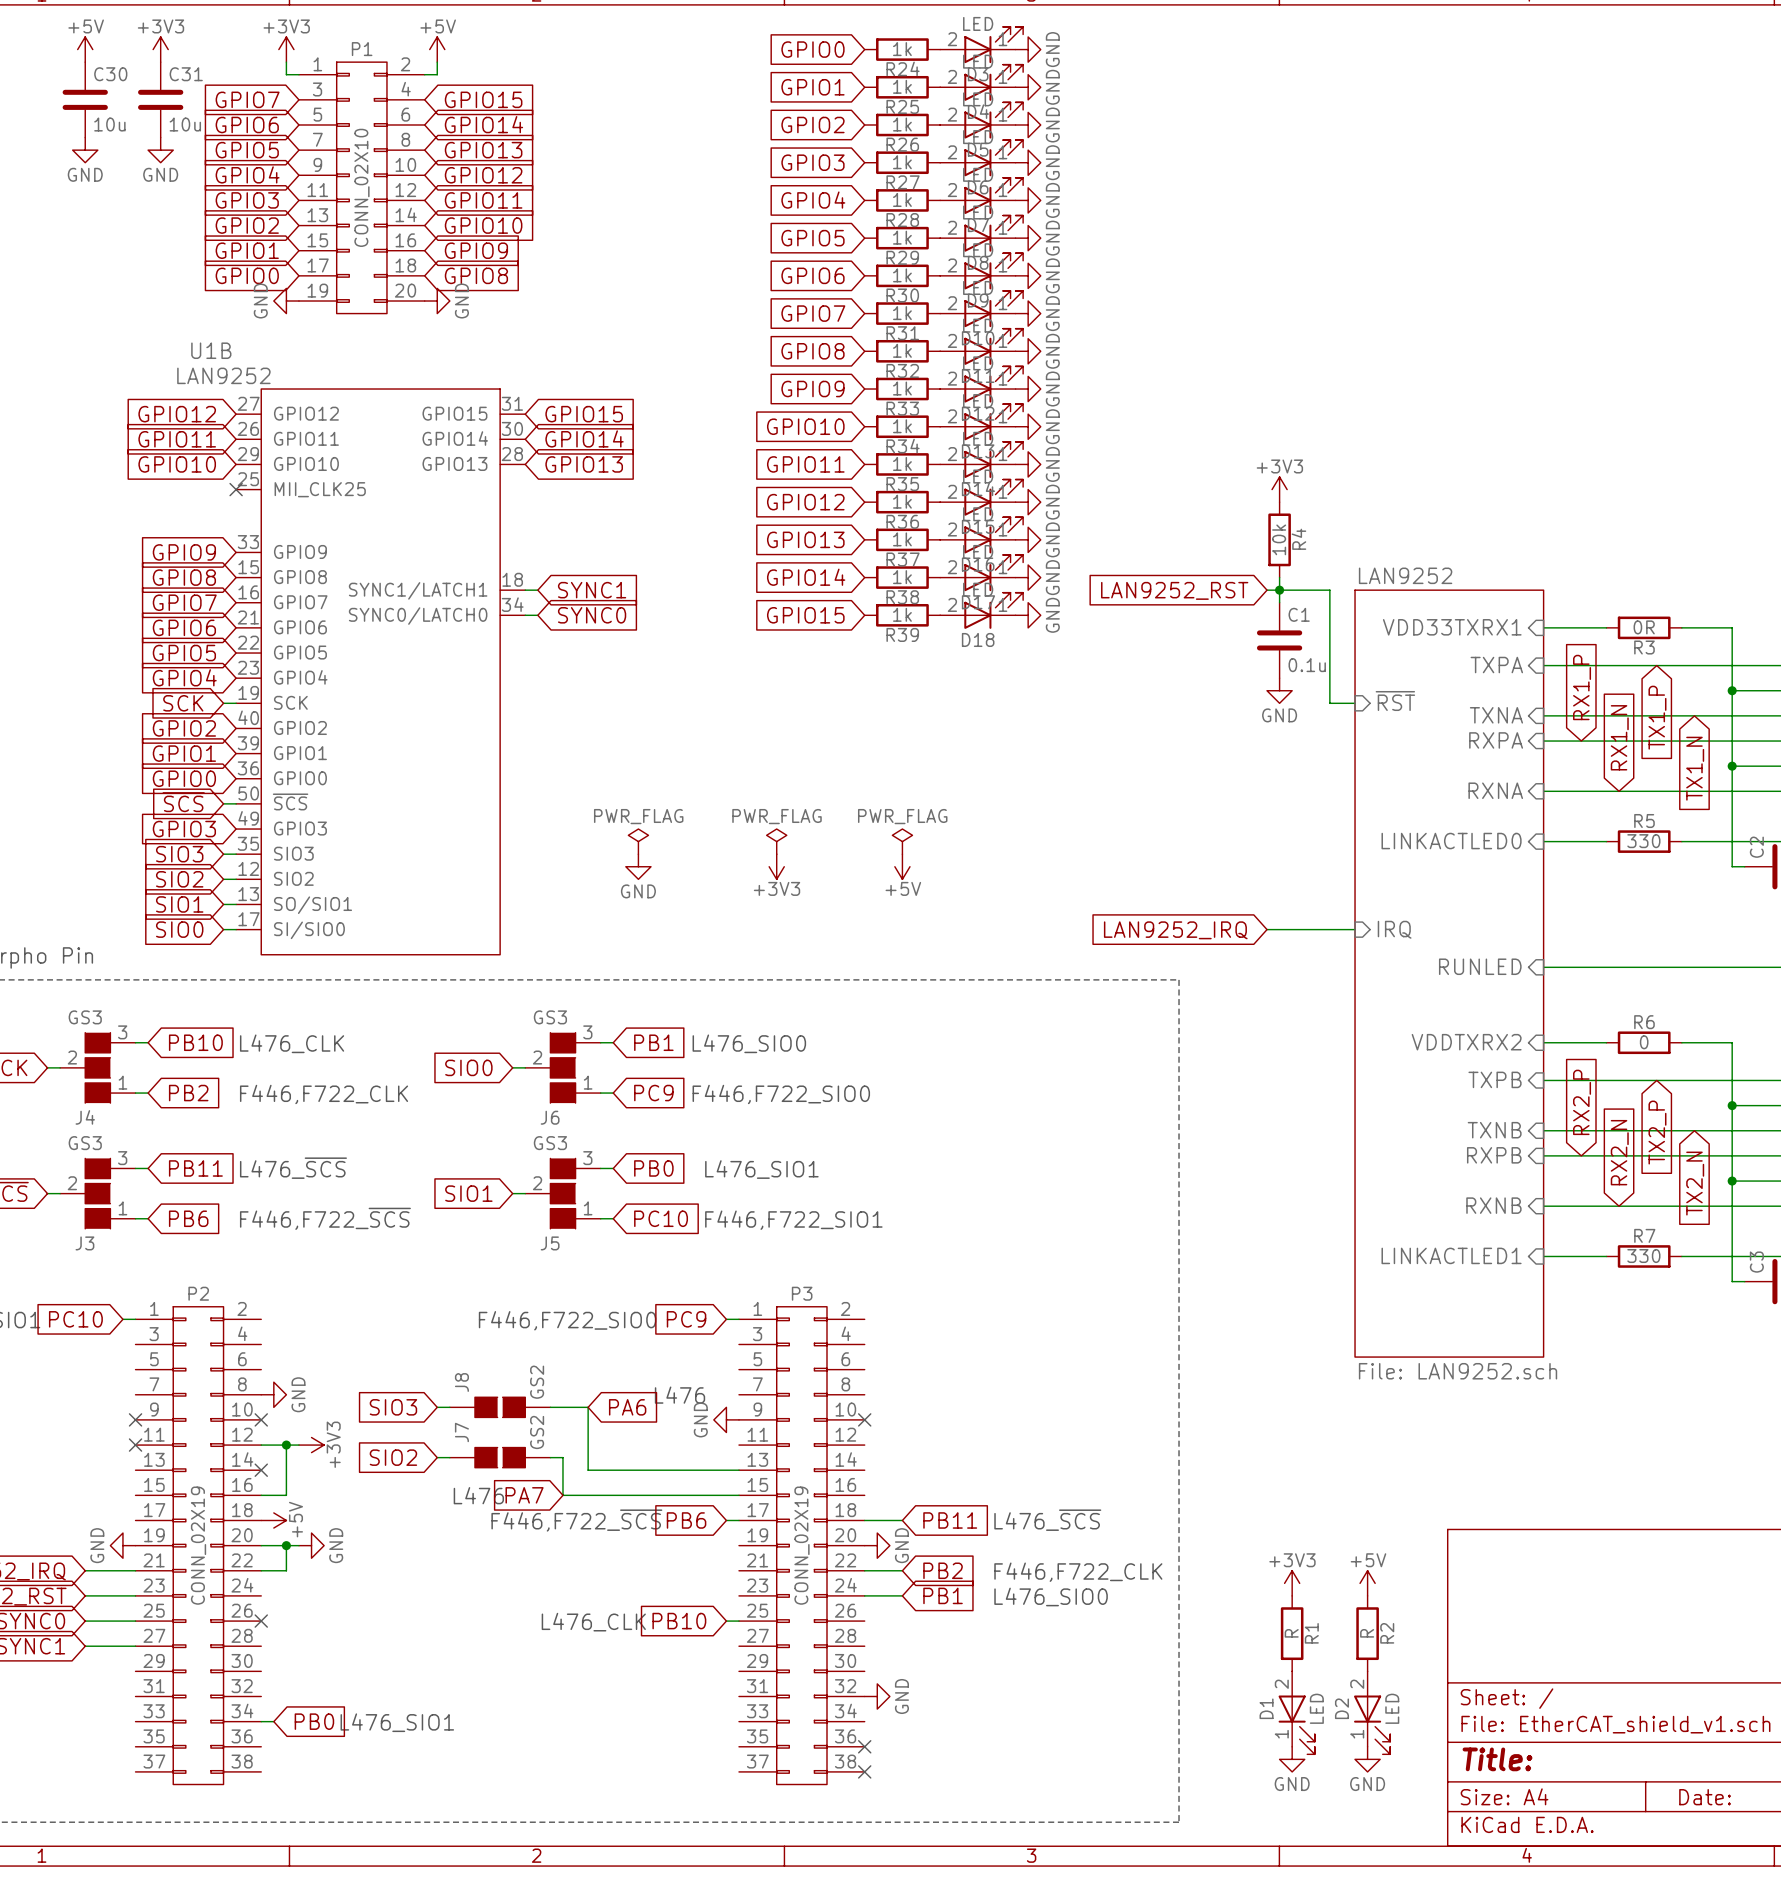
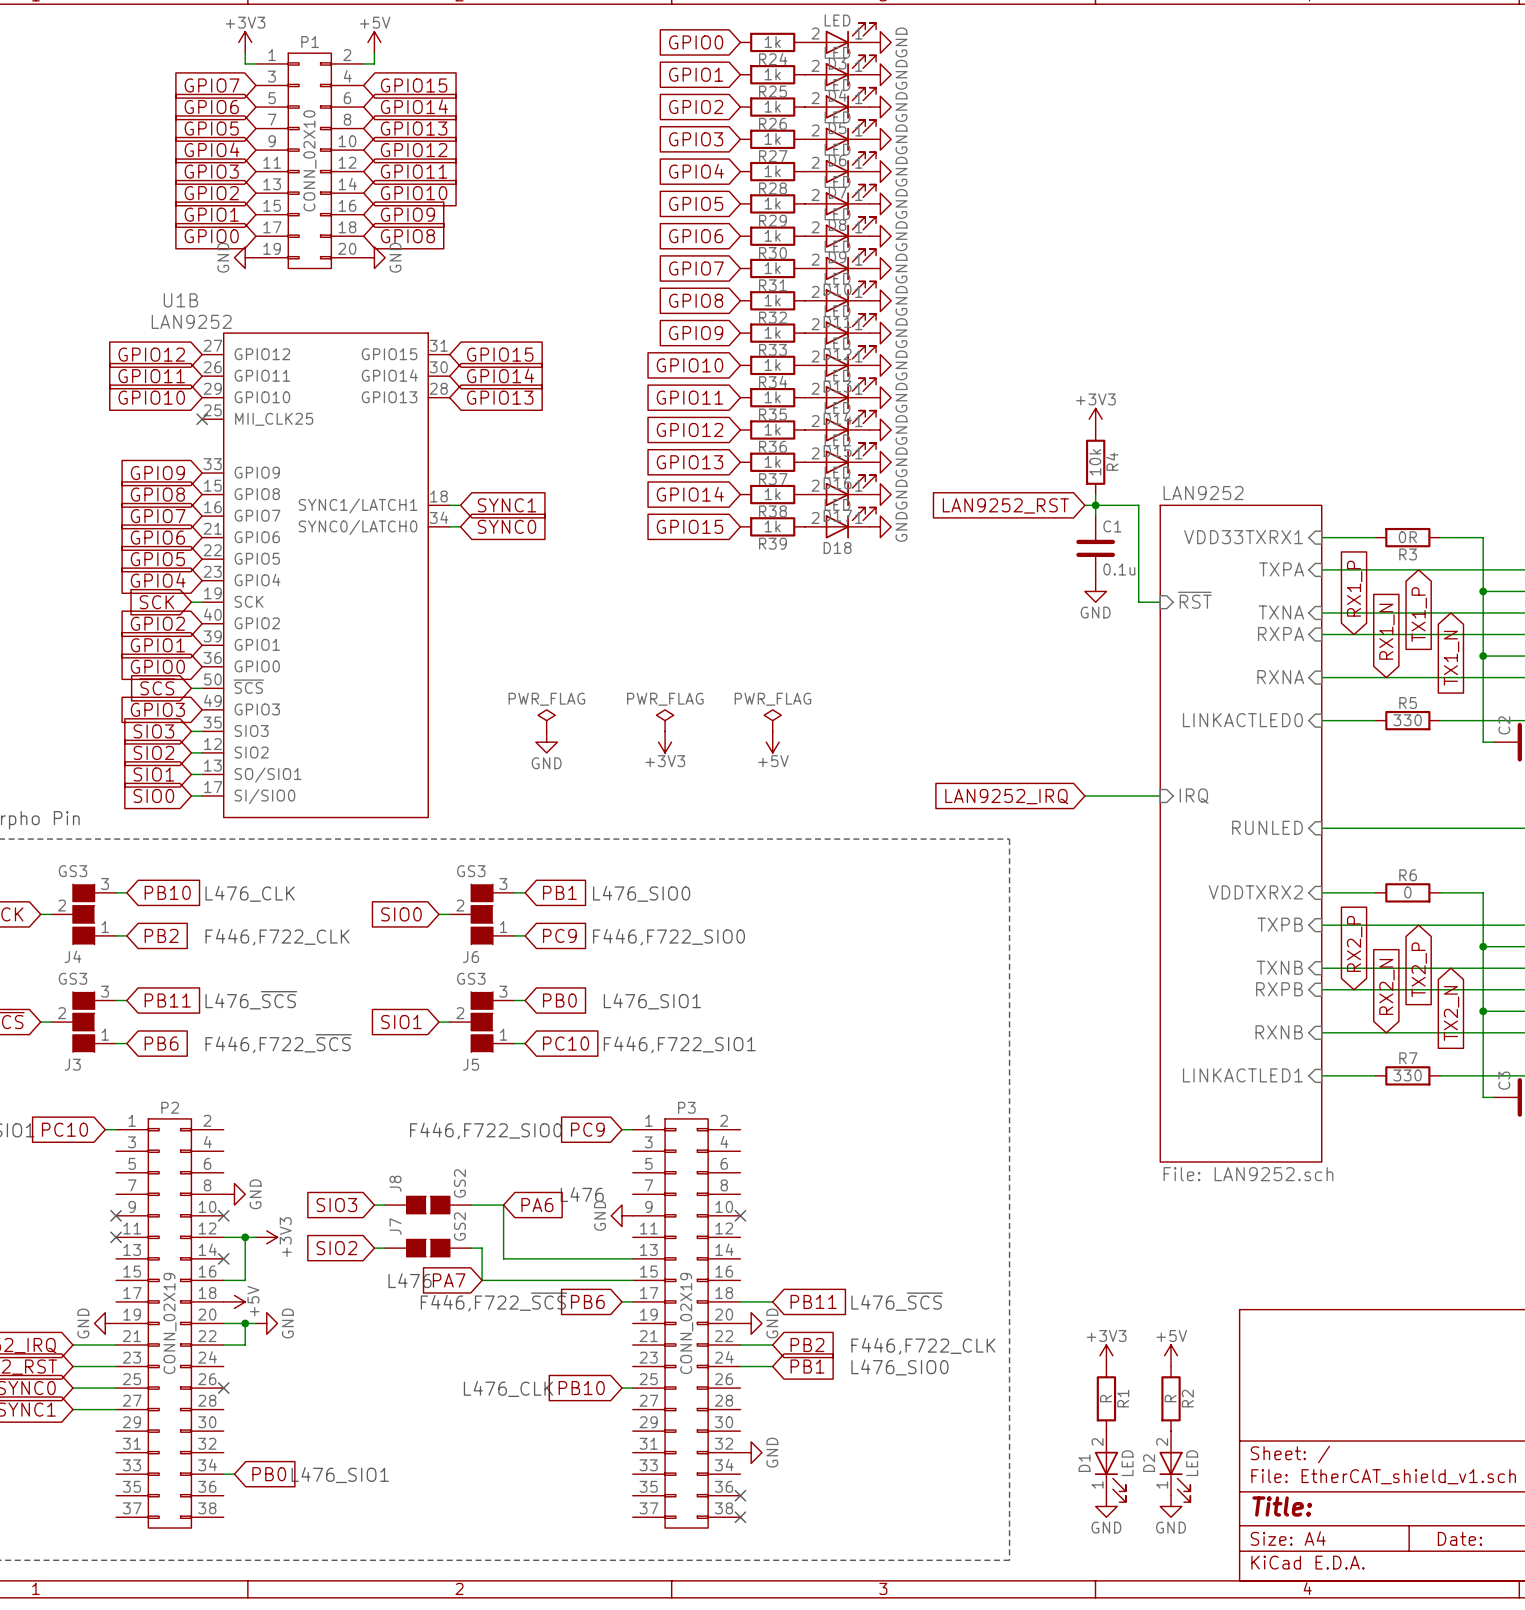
power symbol: +5V (85, 49) -> none
power symbol: +3V3 (160, 49) -> none
C30: 10u (85, 99) -> none
C31: 10u (160, 99) -> none
power symbol: GND (85, 150) -> none
power symbol: GND (160, 150) -> none

